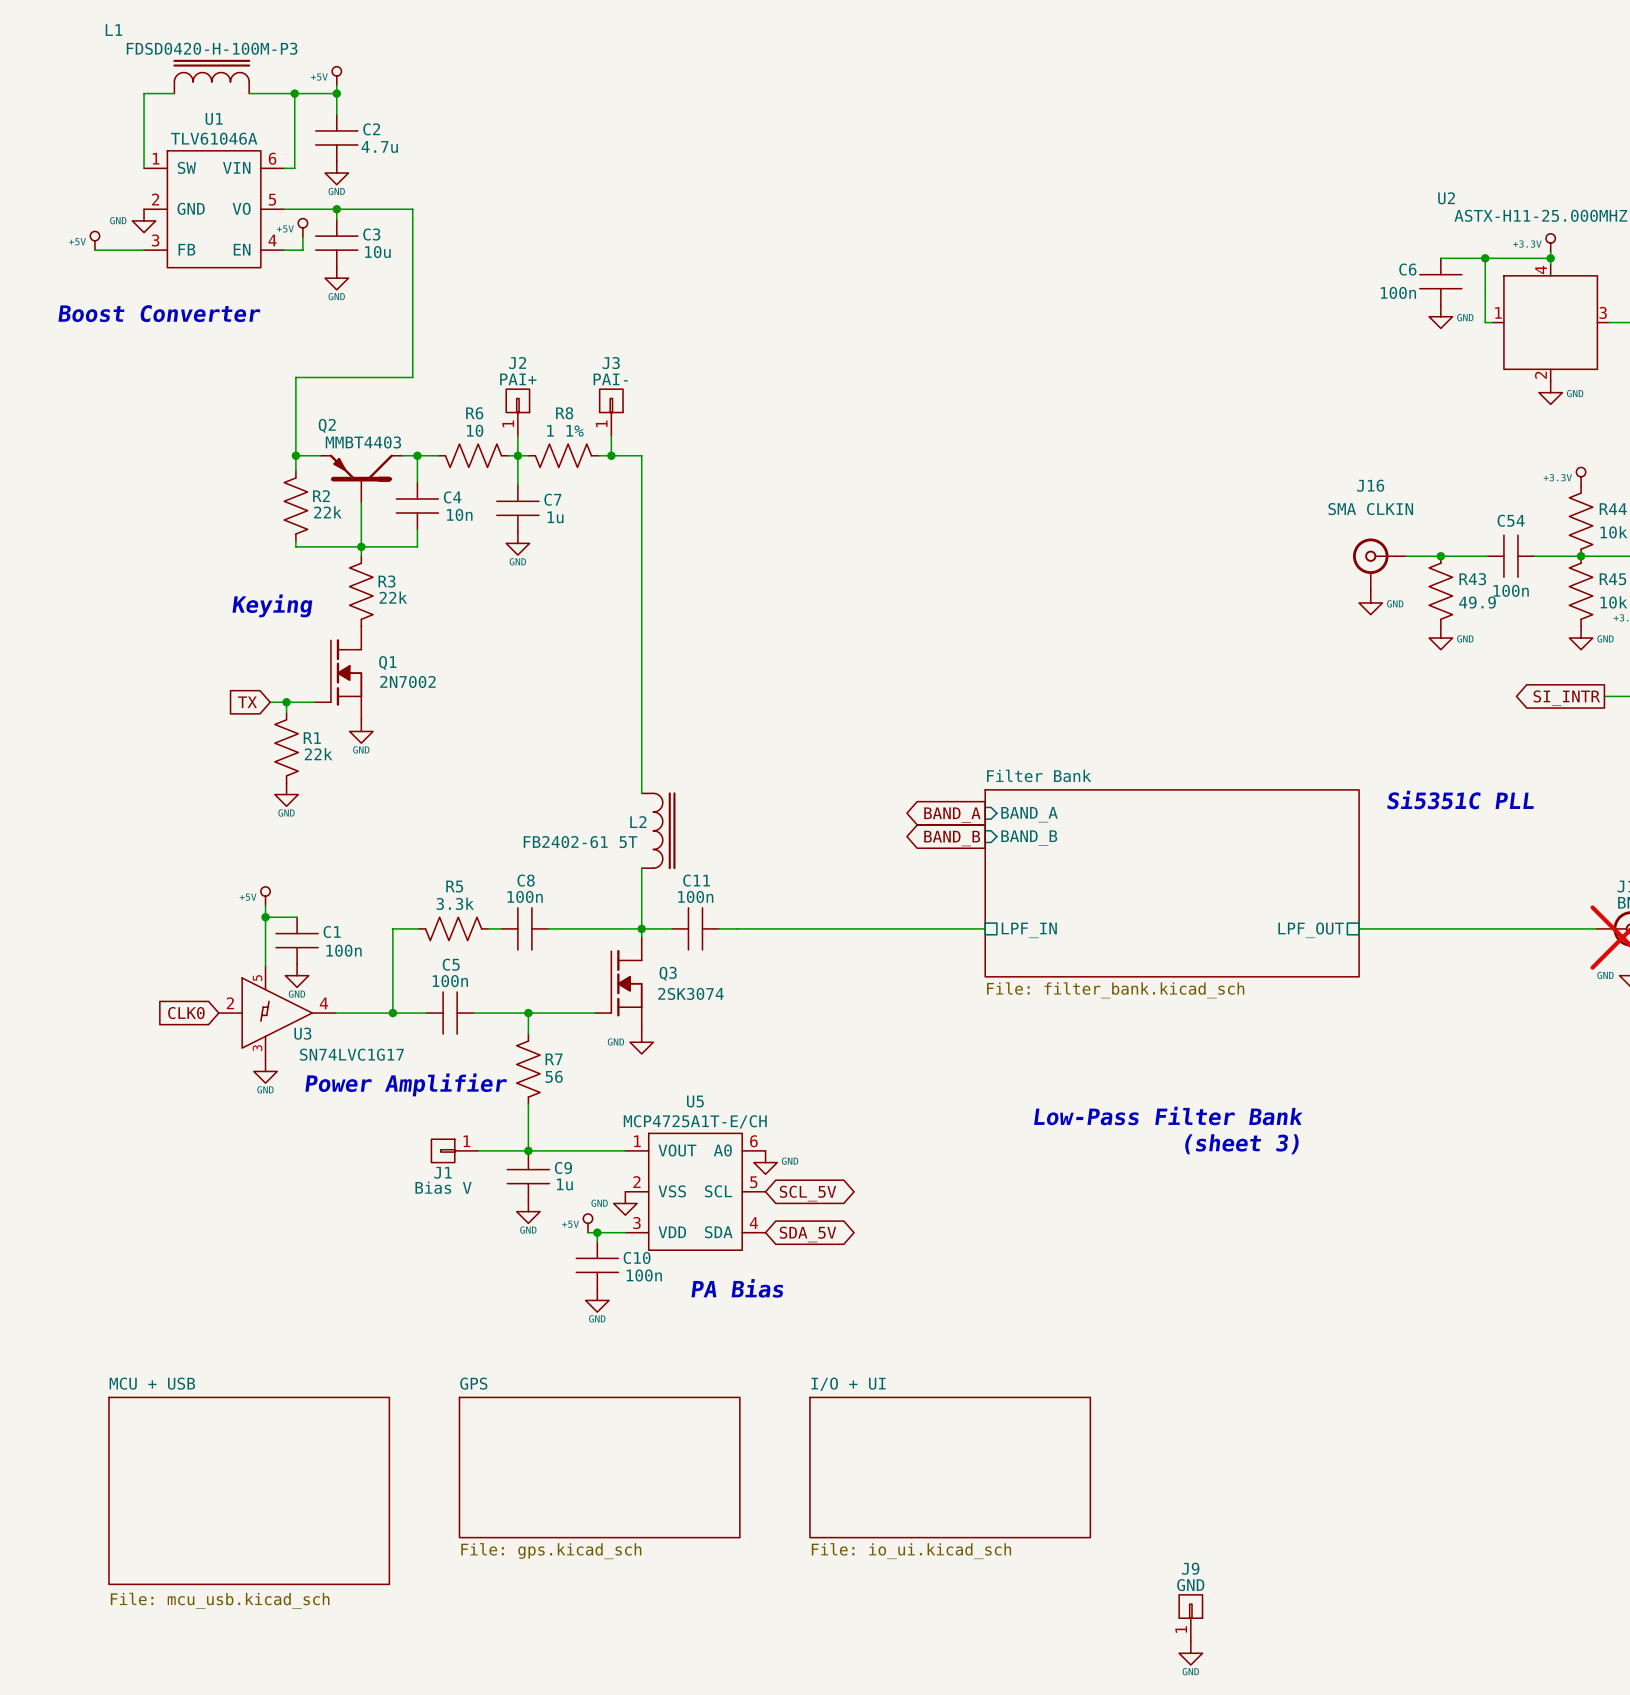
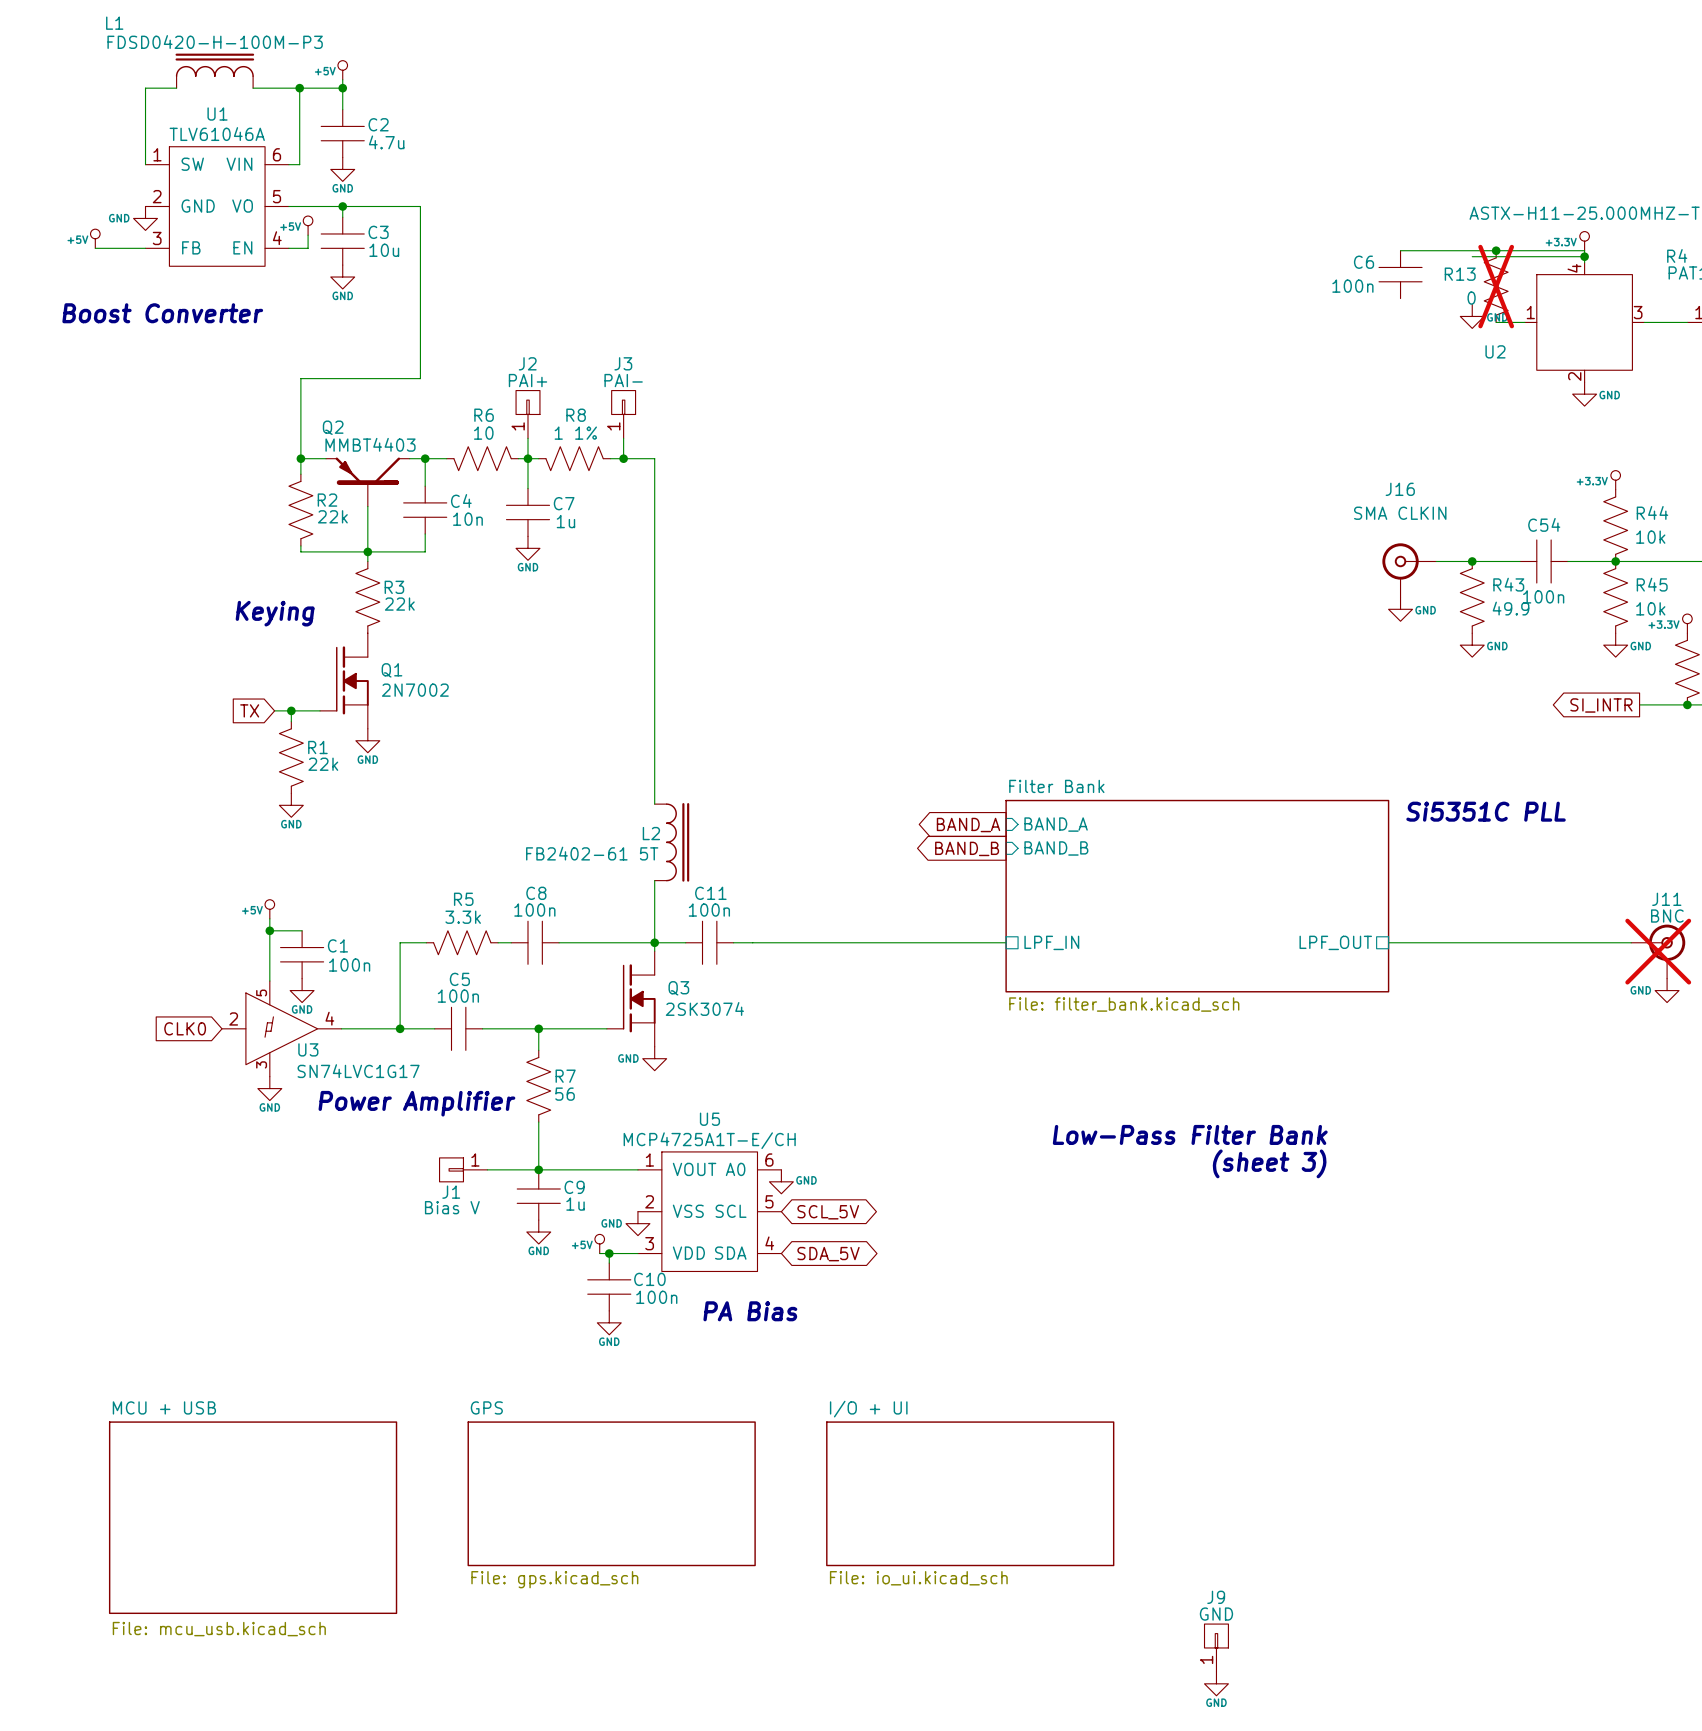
U2 name position: U2 (1446, 198) -> U2 (1495, 351)
wire: none -> (1400, 250) (1584, 250)
wire: (1485, 258) (1485, 322) -> (1496, 322) (1517, 322)
junction position: (1485, 258) -> (1496, 250)
C6 position: (1440, 281) -> (1400, 274)
R13: none -> 0 (1496, 286)

